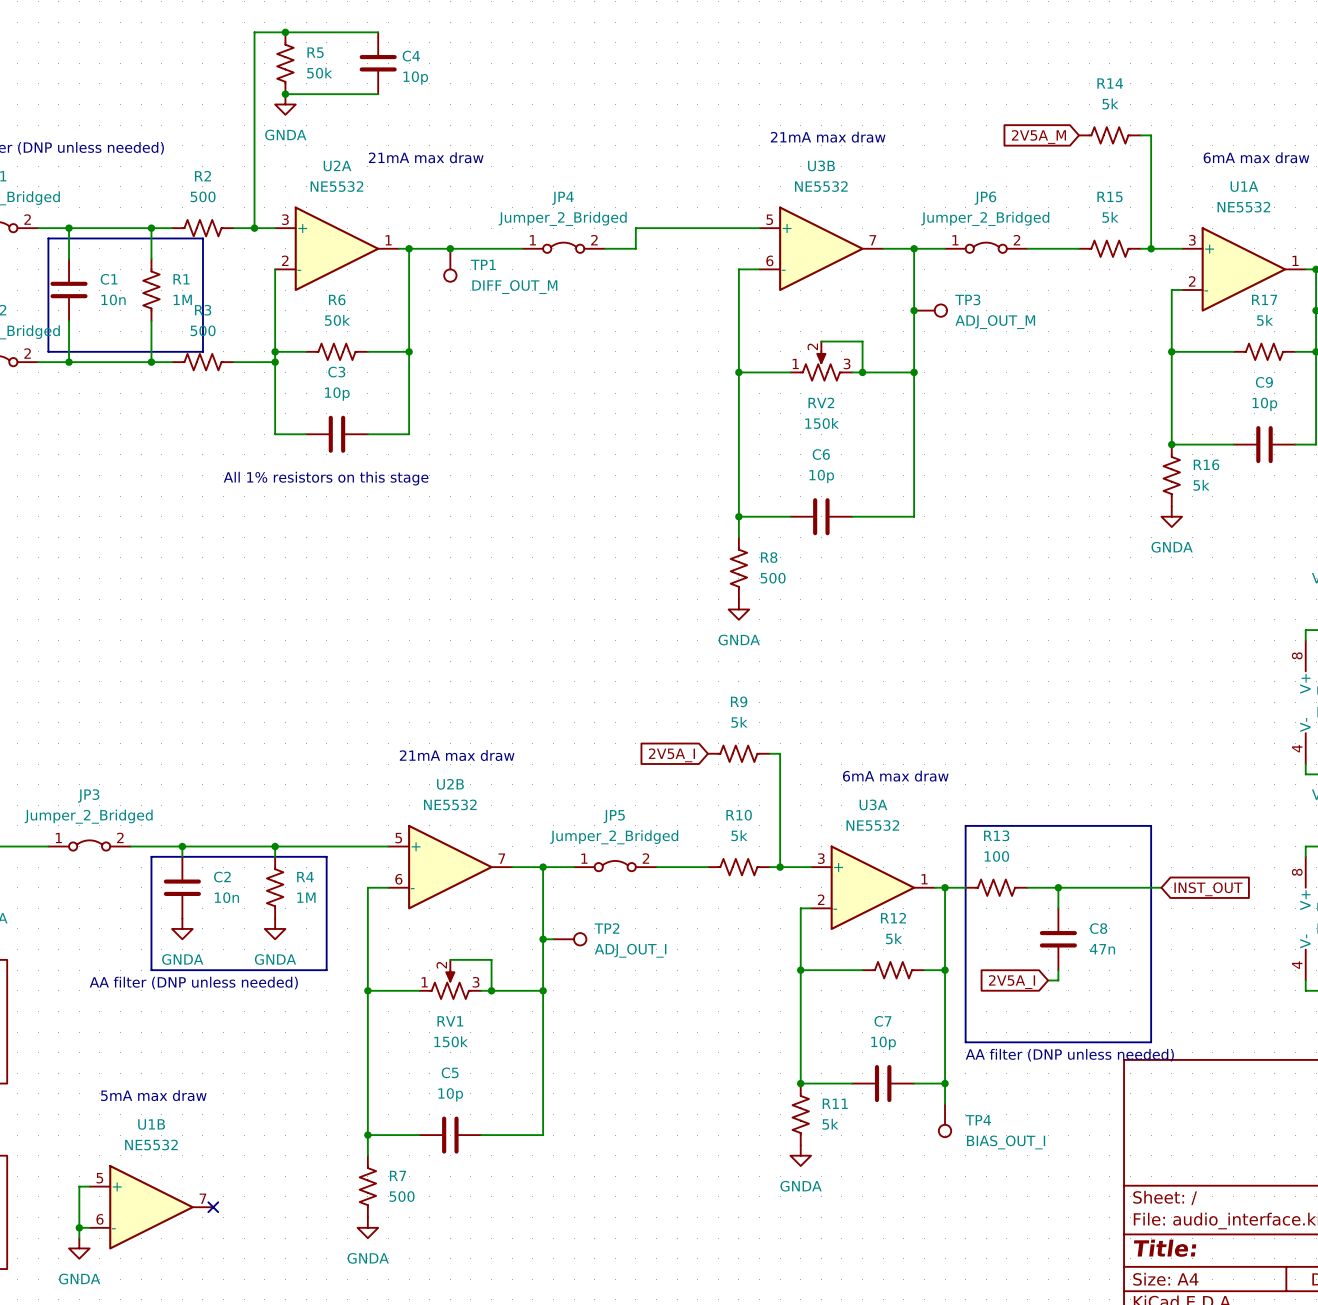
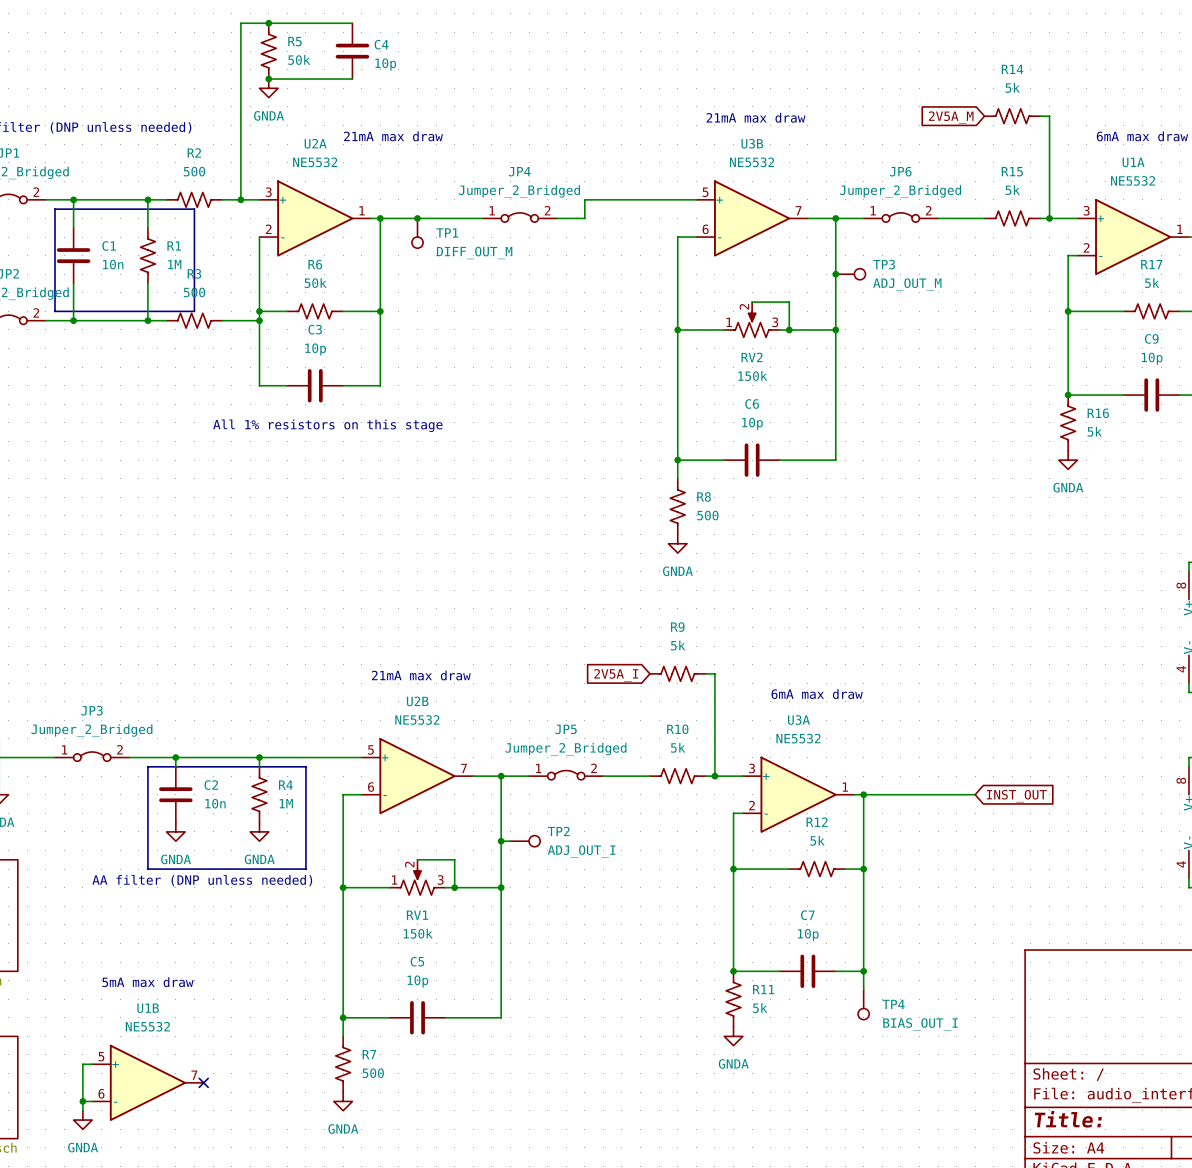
line: (965, 825) (1151, 825) (1151, 1042) (965, 1042) (965, 825) -> none
R13: 100 (996, 887) -> none
wire: (1058, 887) (1058, 908) -> none
junction: (1058, 887) -> none
wire: (1068, 887) (1161, 887) -> none
global label position: INST_OUT (1208, 889) -> INST_OUT (1016, 796)
C8: 47n (1058, 939) -> none
wire: (1058, 970) (1058, 980) (1048, 980) -> none
global label: 2V5A_I (1012, 982) -> none
text: AA filter (DNP unless needed) (1069, 1055) -> none

